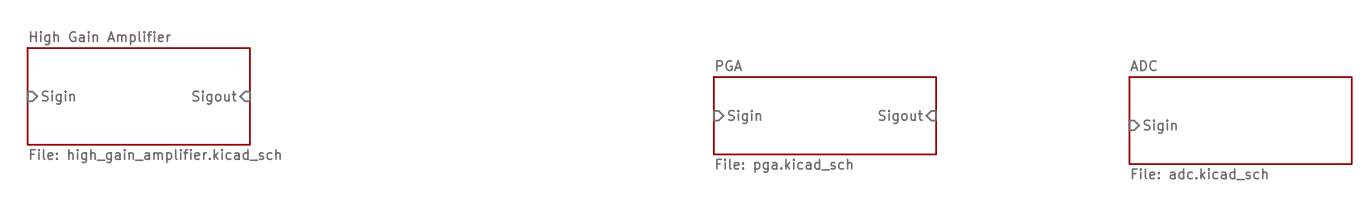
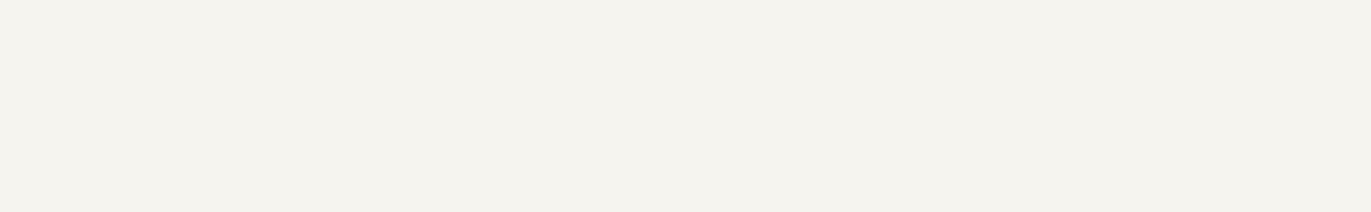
sheet High Gain Amplifier: File: high_gain_amplifier.kicad_sch (138, 96) -> none
sheet pin: Sigin (58, 97) -> none
sheet pin: Sigout (214, 97) -> none
sheet PGA: File: pga.kicad_sch (824, 115) -> none
sheet pin: Sigin (744, 117) -> none
sheet pin: Sigout (900, 117) -> none
sheet ADC: File: adc.kicad_sch (1240, 120) -> none
sheet pin: Sigin (1160, 126) -> none

